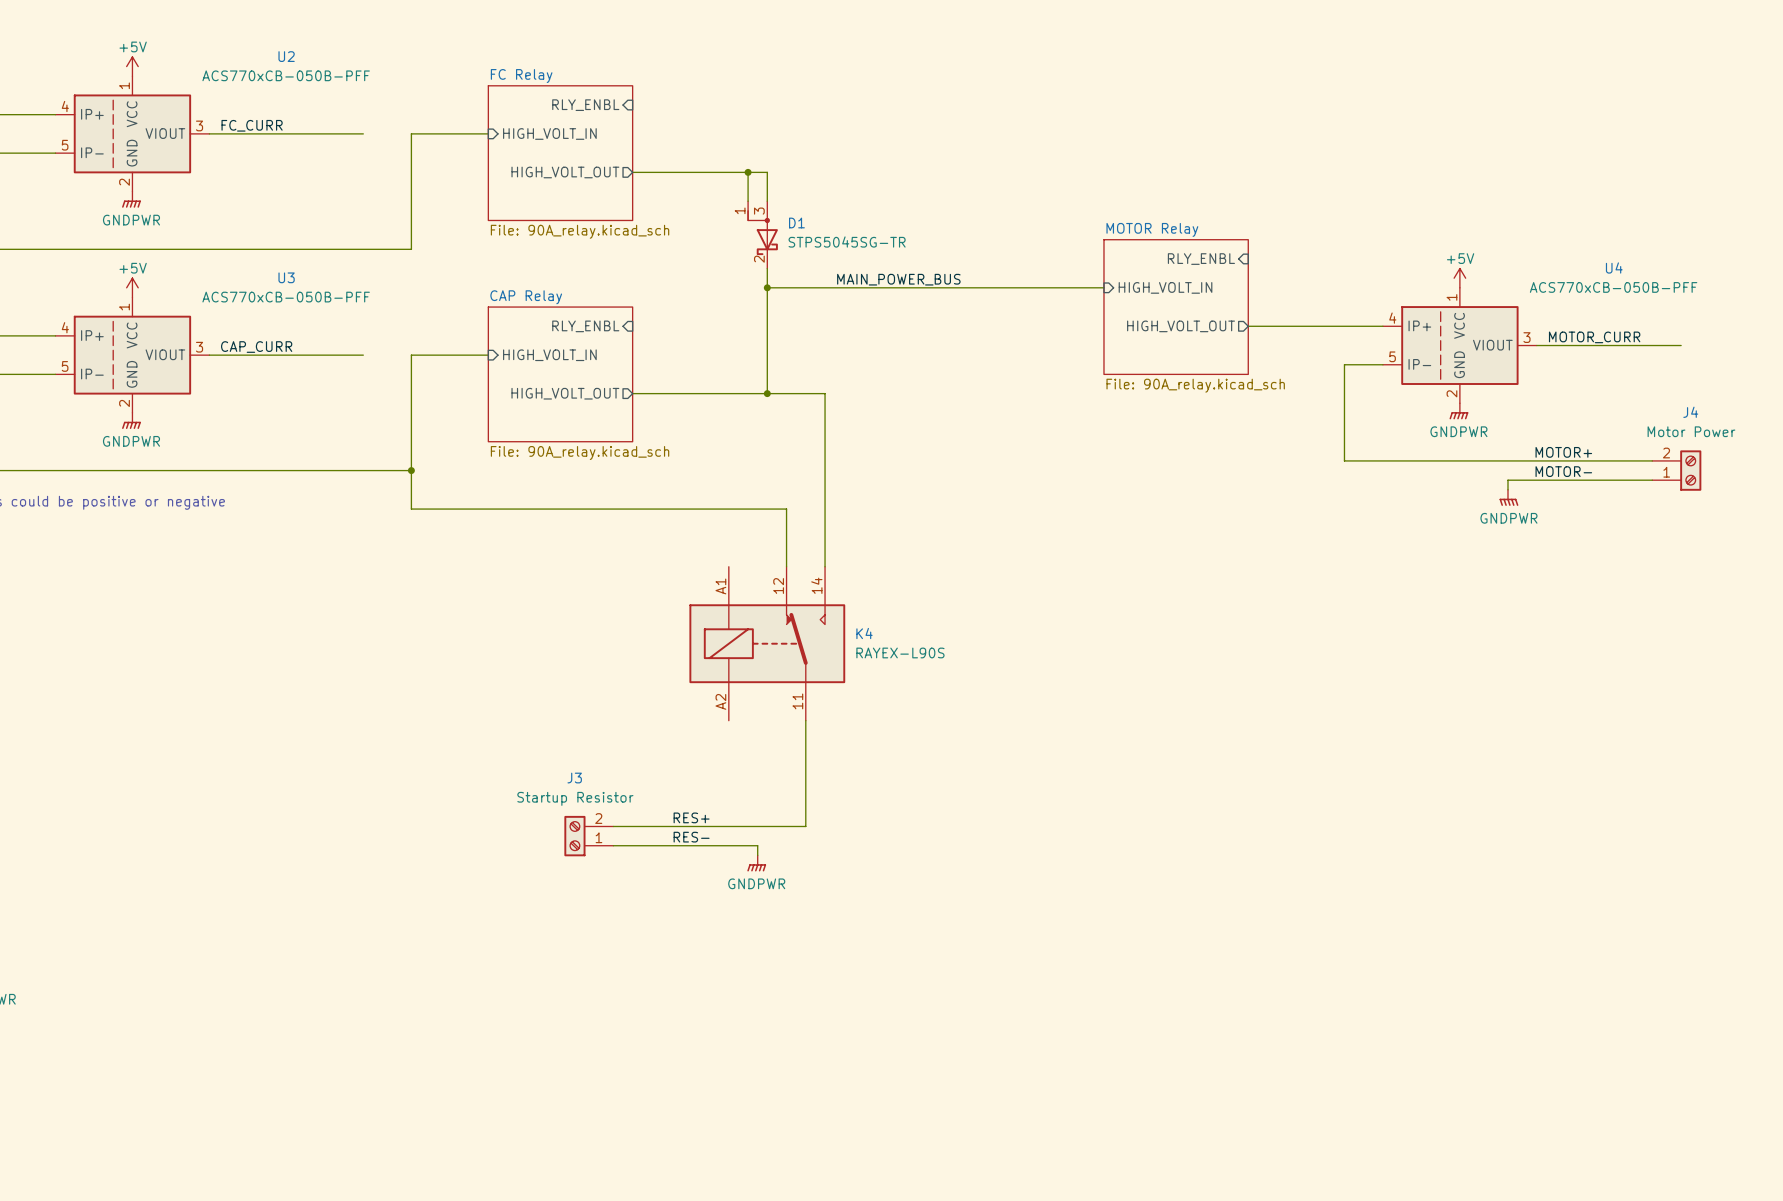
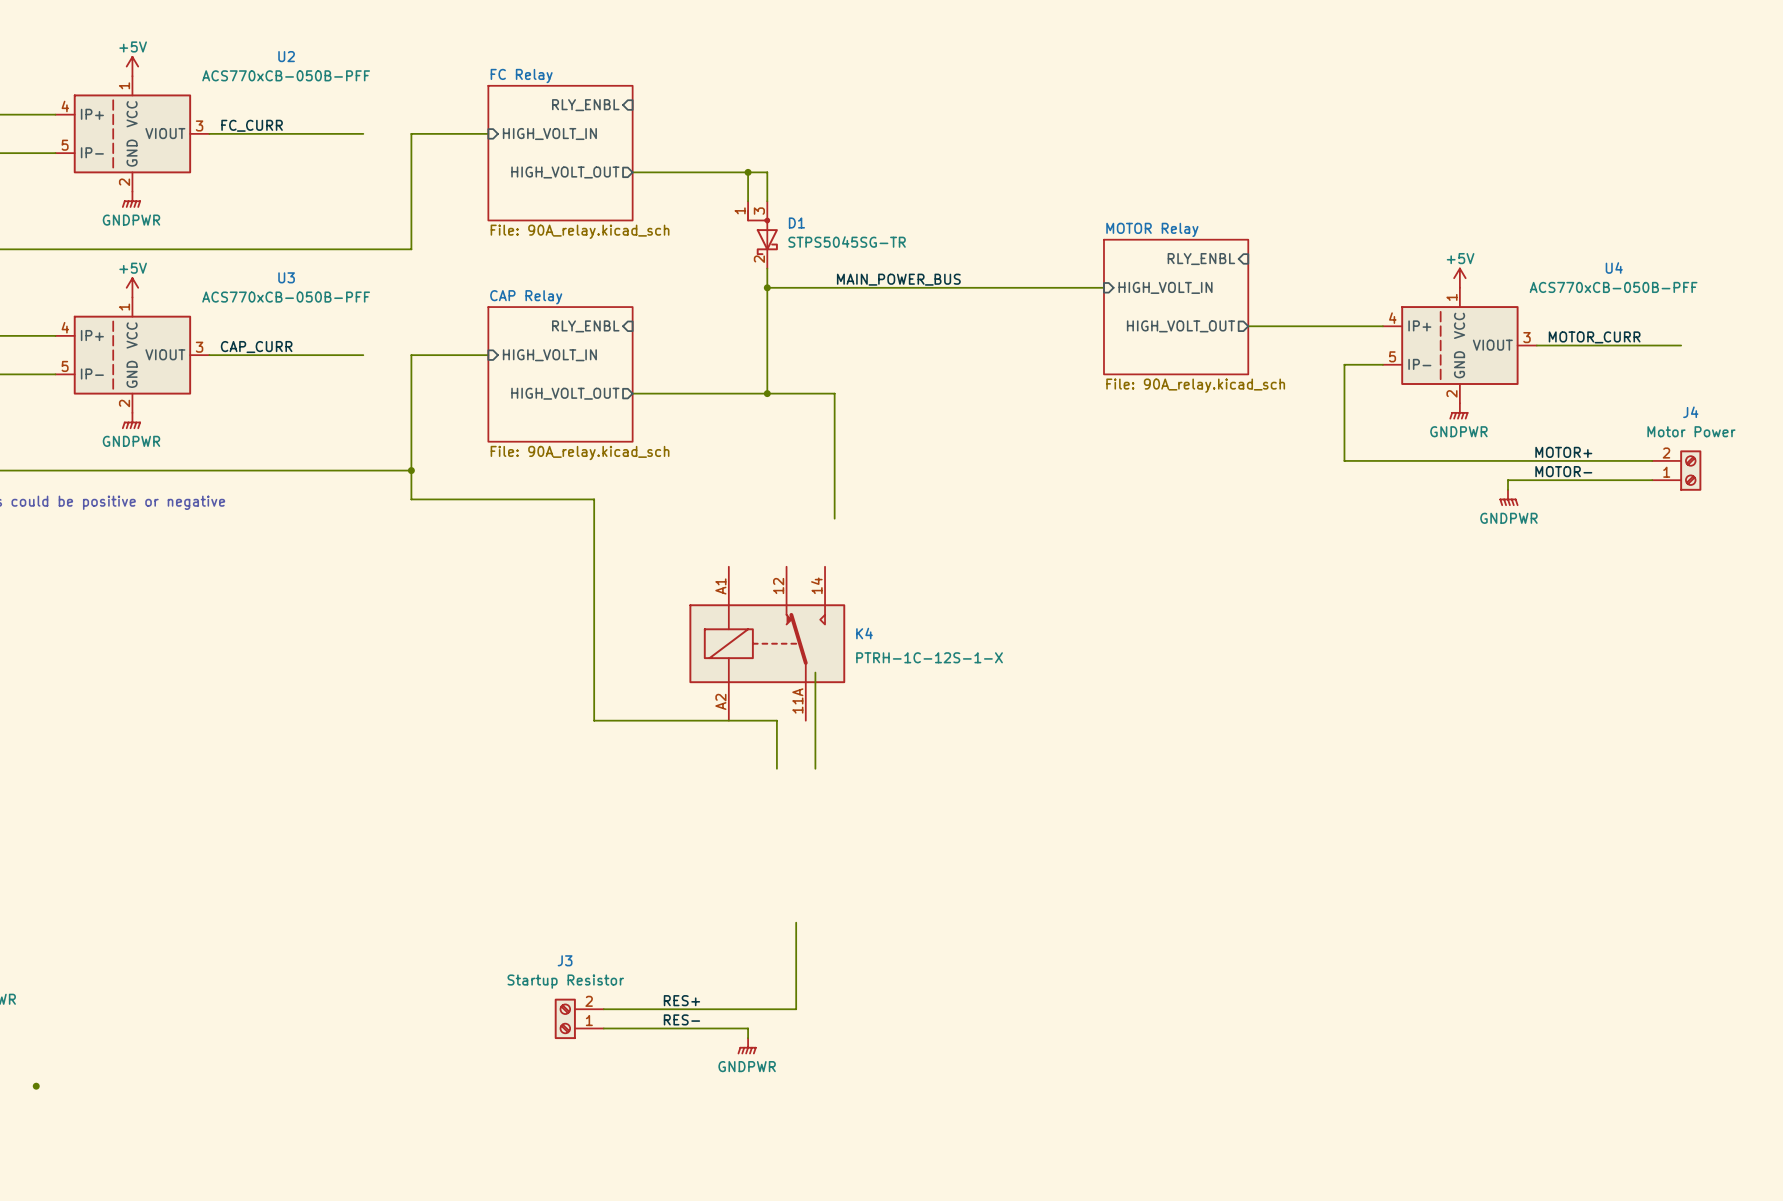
wire: (825, 393) (825, 566) -> (825, 393) (834, 393) (834, 518)
wire: (411, 499) (411, 509) (786, 509) (786, 566) -> (411, 499) (594, 499) (594, 720) (776, 720) (776, 768)
K4 value: RAYEX-L90S (900, 652) -> PTRH-1C-12S-1-X (929, 657)
wire: none -> (815, 672) (815, 768)
K4 pin number: 11 (797, 701) -> 11A (797, 700)
wire: (805, 720) (805, 826) (613, 826) -> none
label position: RES+ (691, 817) -> RES+ (681, 1000)
J3 position: (588, 836) -> (579, 1018)
label position: RES- (691, 837) -> RES- (681, 1019)
wire: (613, 845) (757, 845) (757, 855) -> (603, 1028) (748, 1028) (748, 1038)
power symbol position: GNDPWR (756, 863) -> GNDPWR (747, 1046)
wire: none -> (796, 922) (796, 1009) (603, 1009)
junction: none -> (36, 1086)

